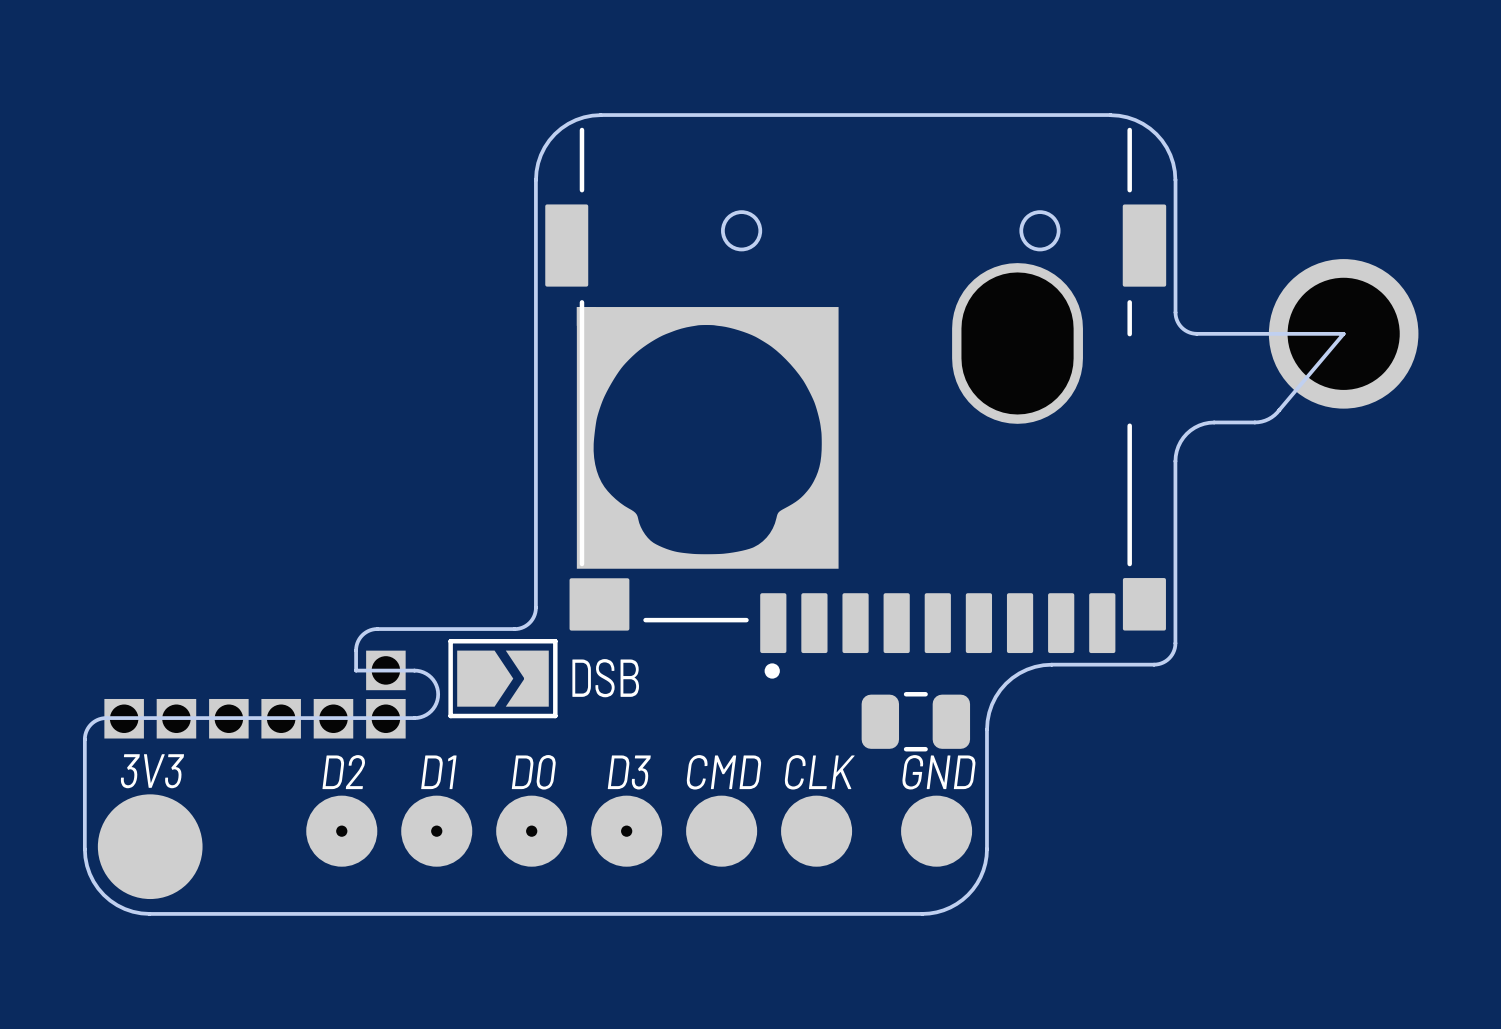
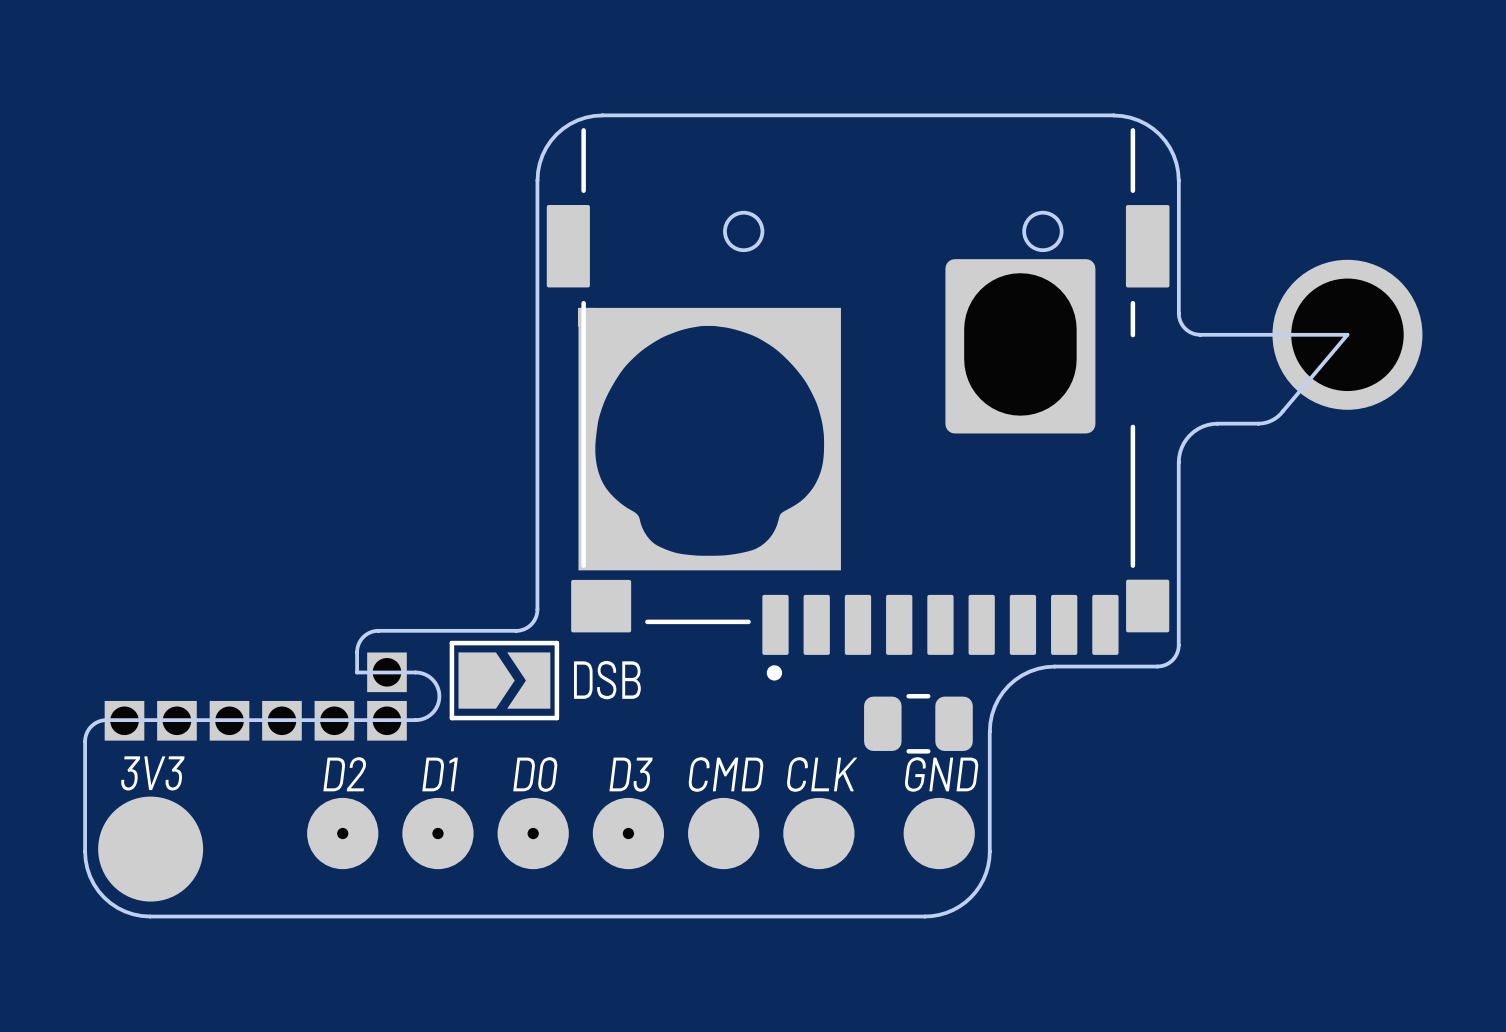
part footprint: [952, 263, 1083, 424] -> [945, 259, 1096, 434]

